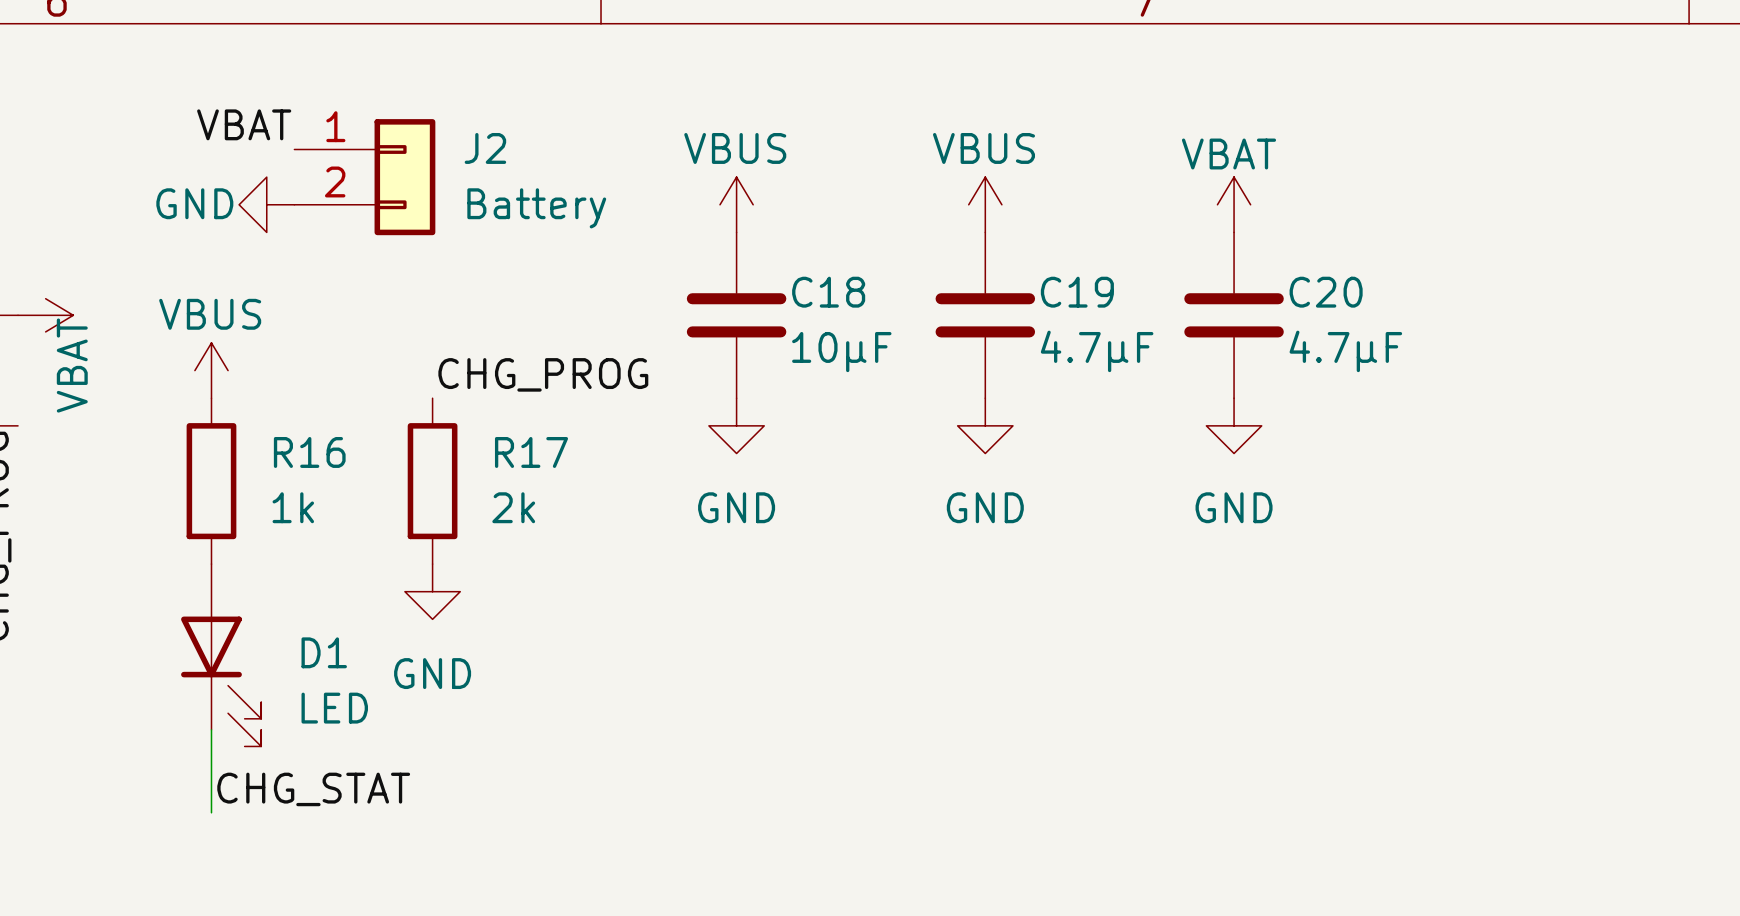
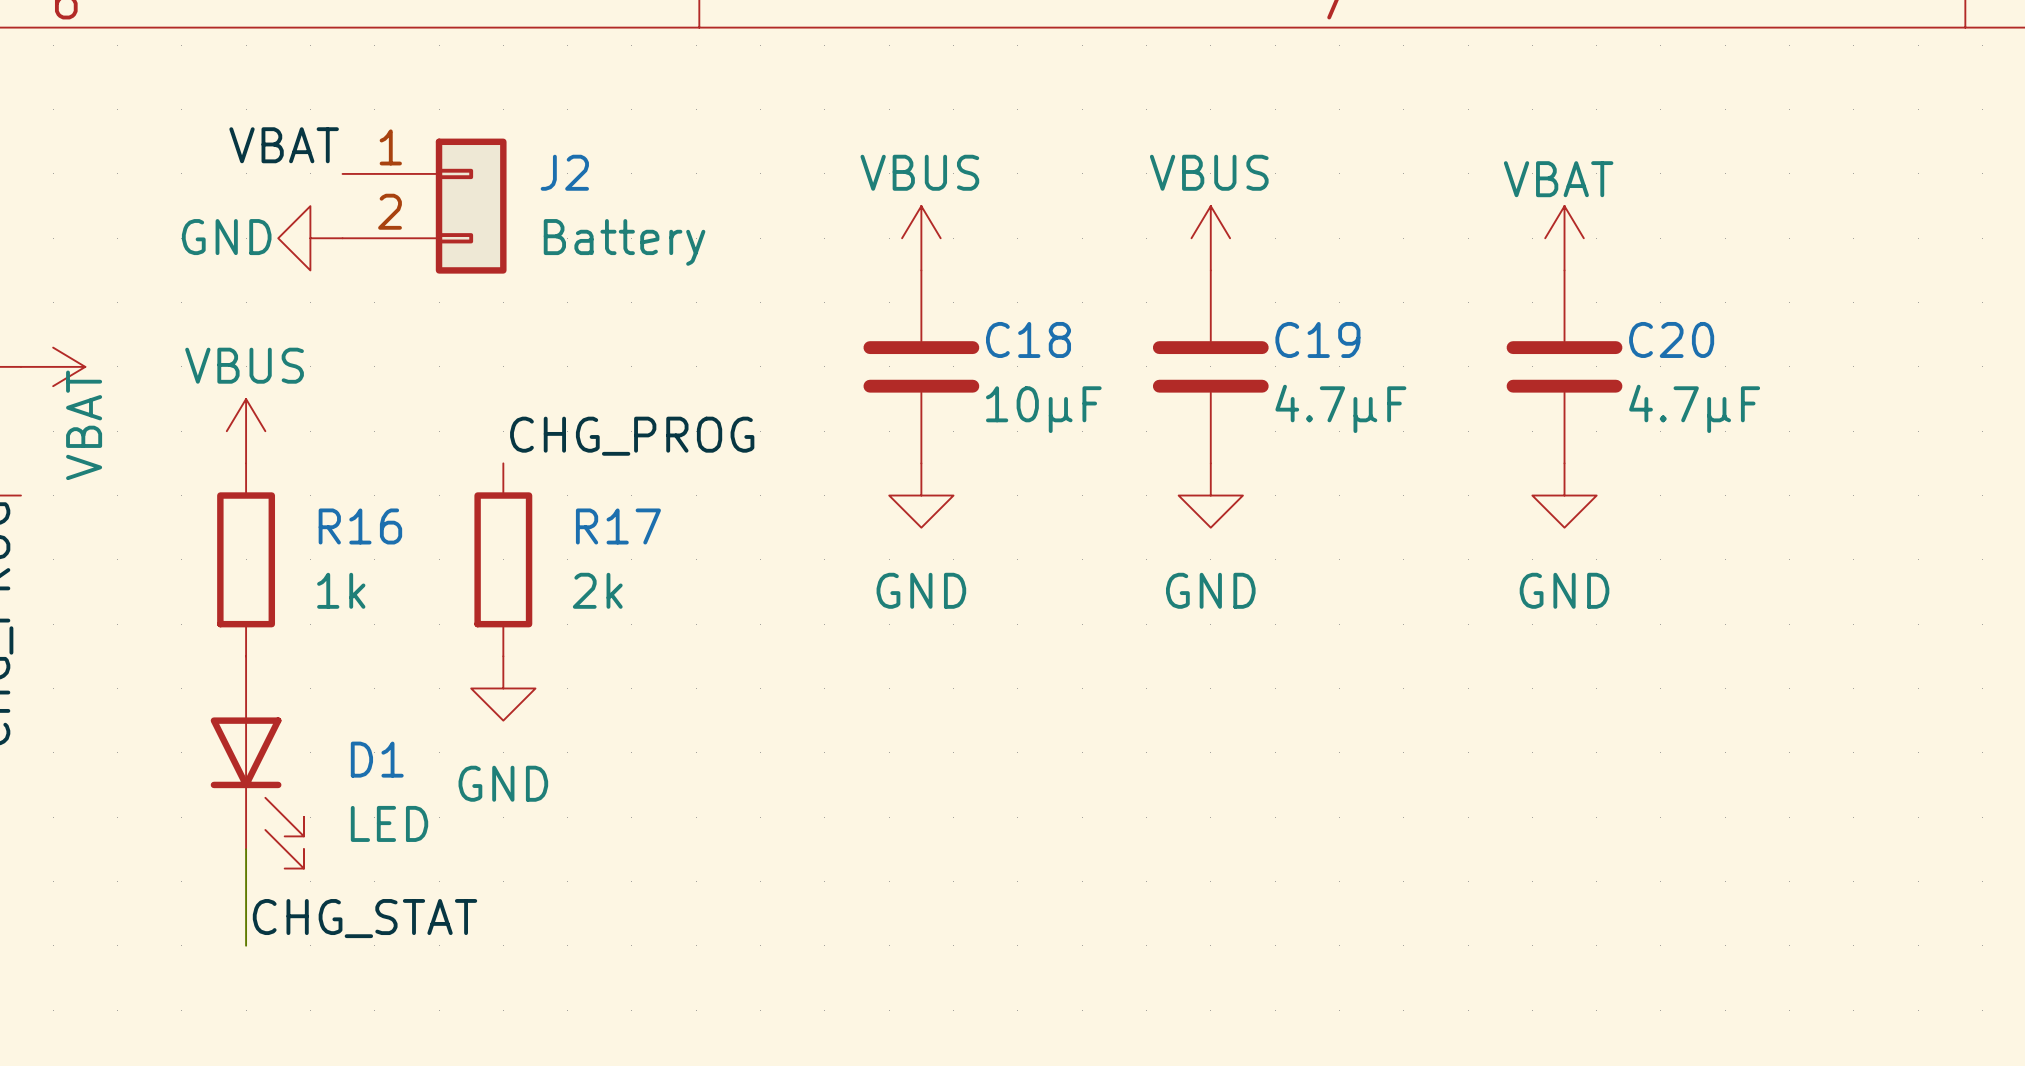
power symbol position: VBUS (736, 204) -> VBUS (921, 238)
power symbol position: VBUS (985, 204) -> VBUS (1210, 238)
power symbol position: VBAT (1234, 204) -> VBAT (1564, 238)
C18 position: (736, 315) -> (921, 366)
C19 position: (985, 315) -> (1210, 366)
C20 position: (1234, 315) -> (1564, 366)
power symbol position: GND (736, 425) -> GND (921, 495)
power symbol position: GND (985, 425) -> GND (1210, 495)
power symbol: GND (1234, 425) -> none
power symbol: none -> GND (1564, 495)

